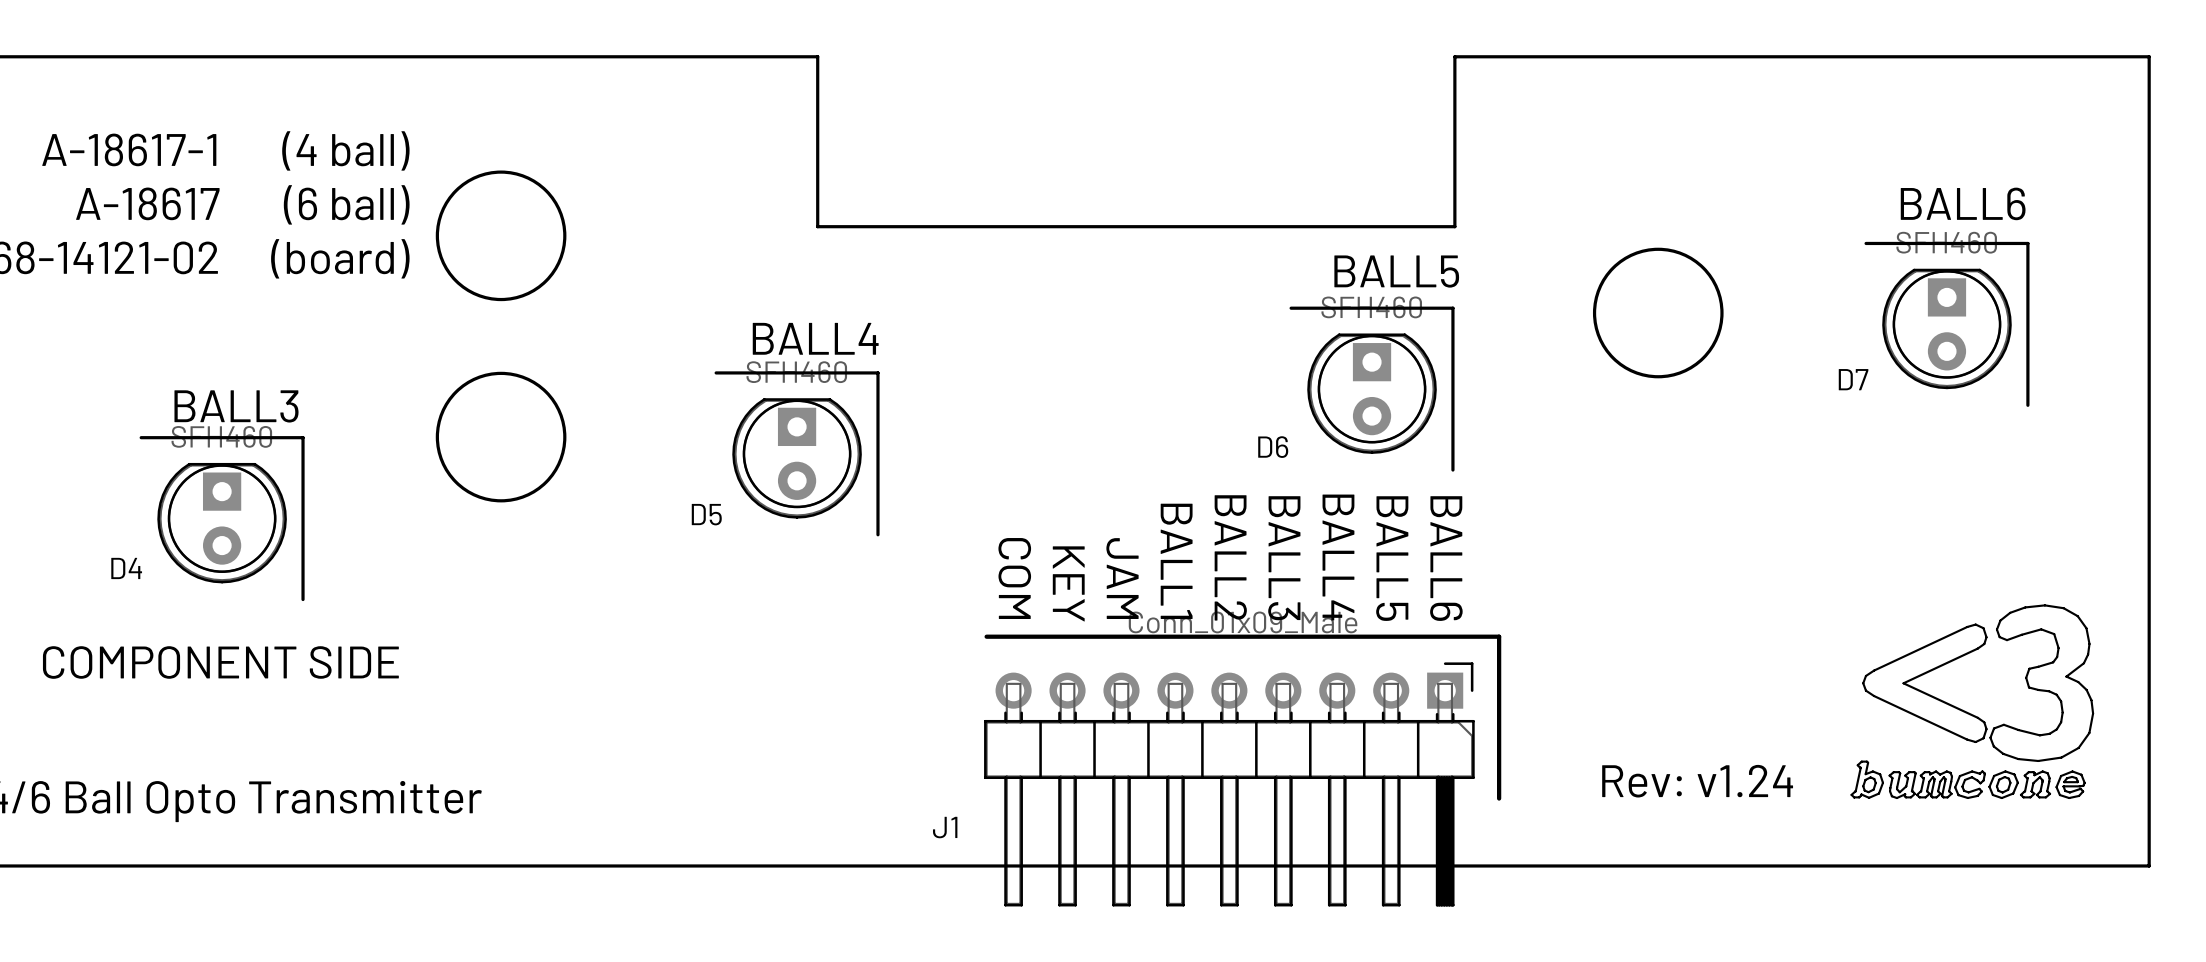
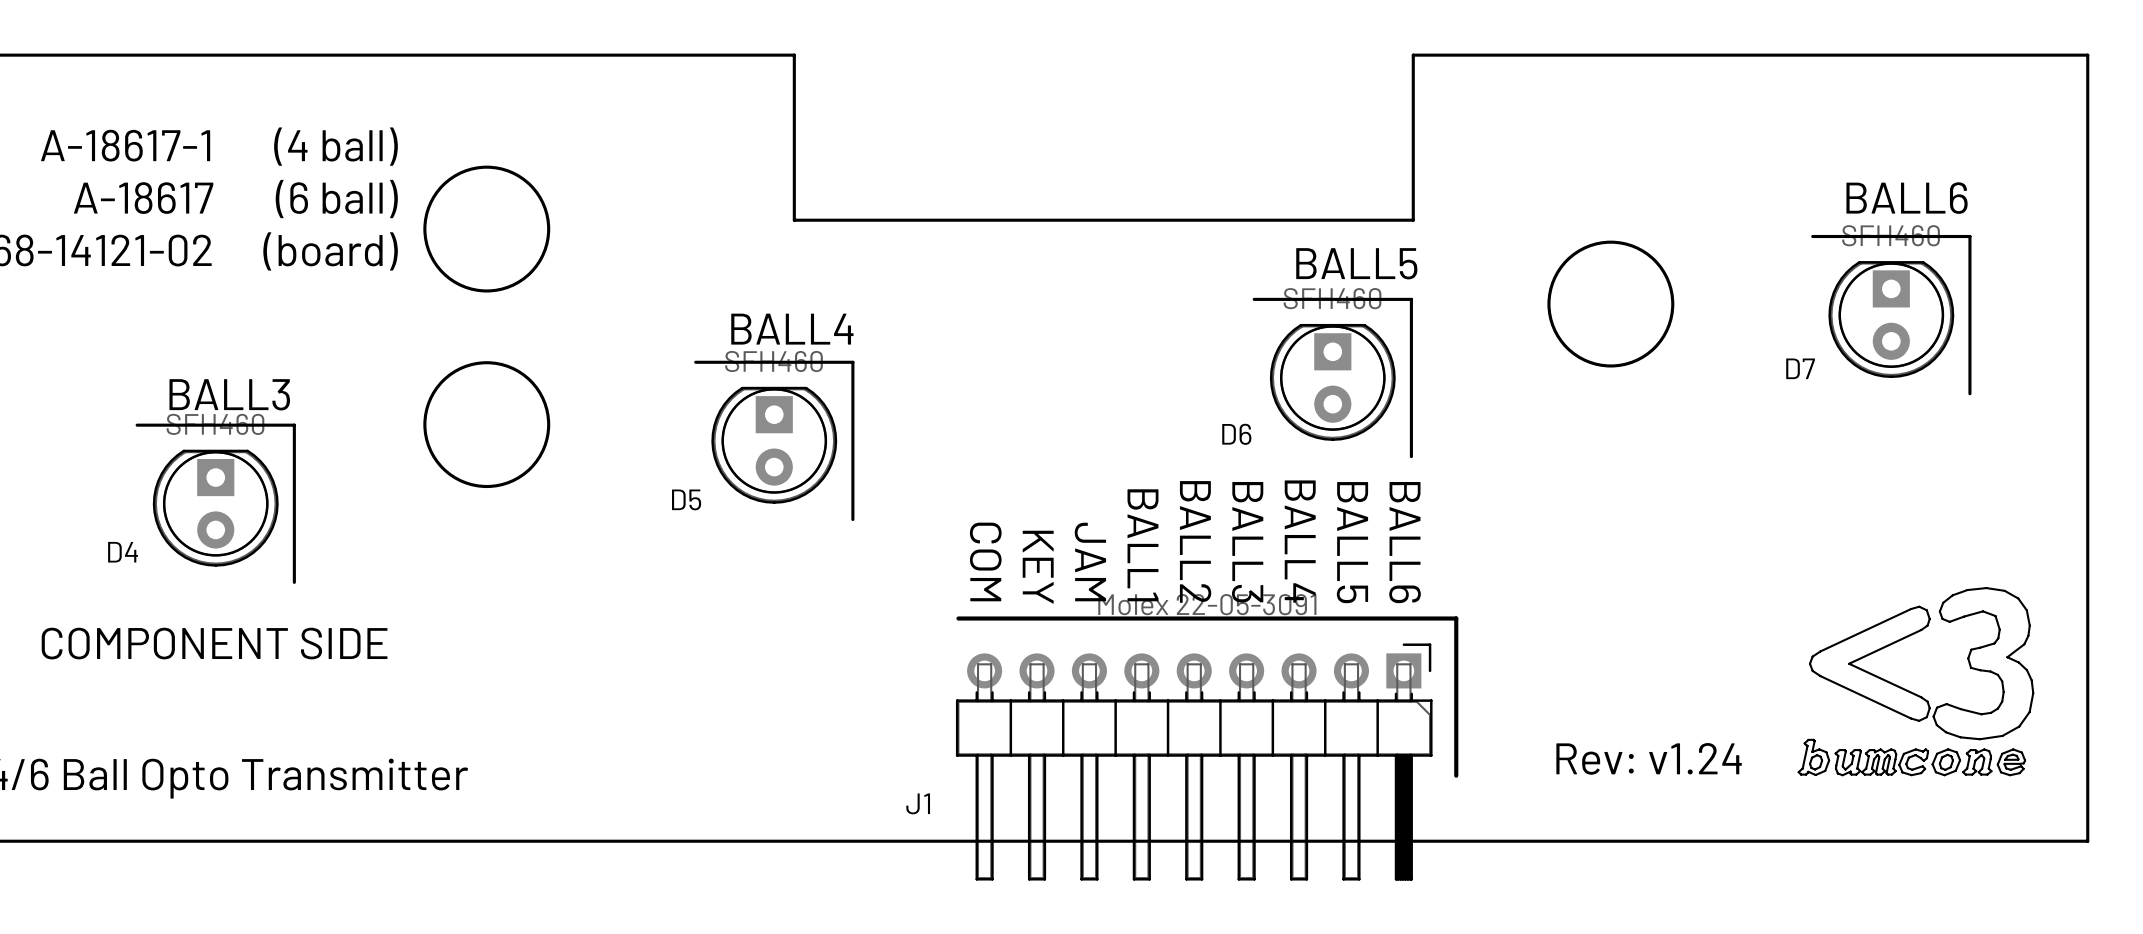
J1 value: Conn_01x09_Male (1243, 622) -> Molex 22-05-3091 (1207, 604)

